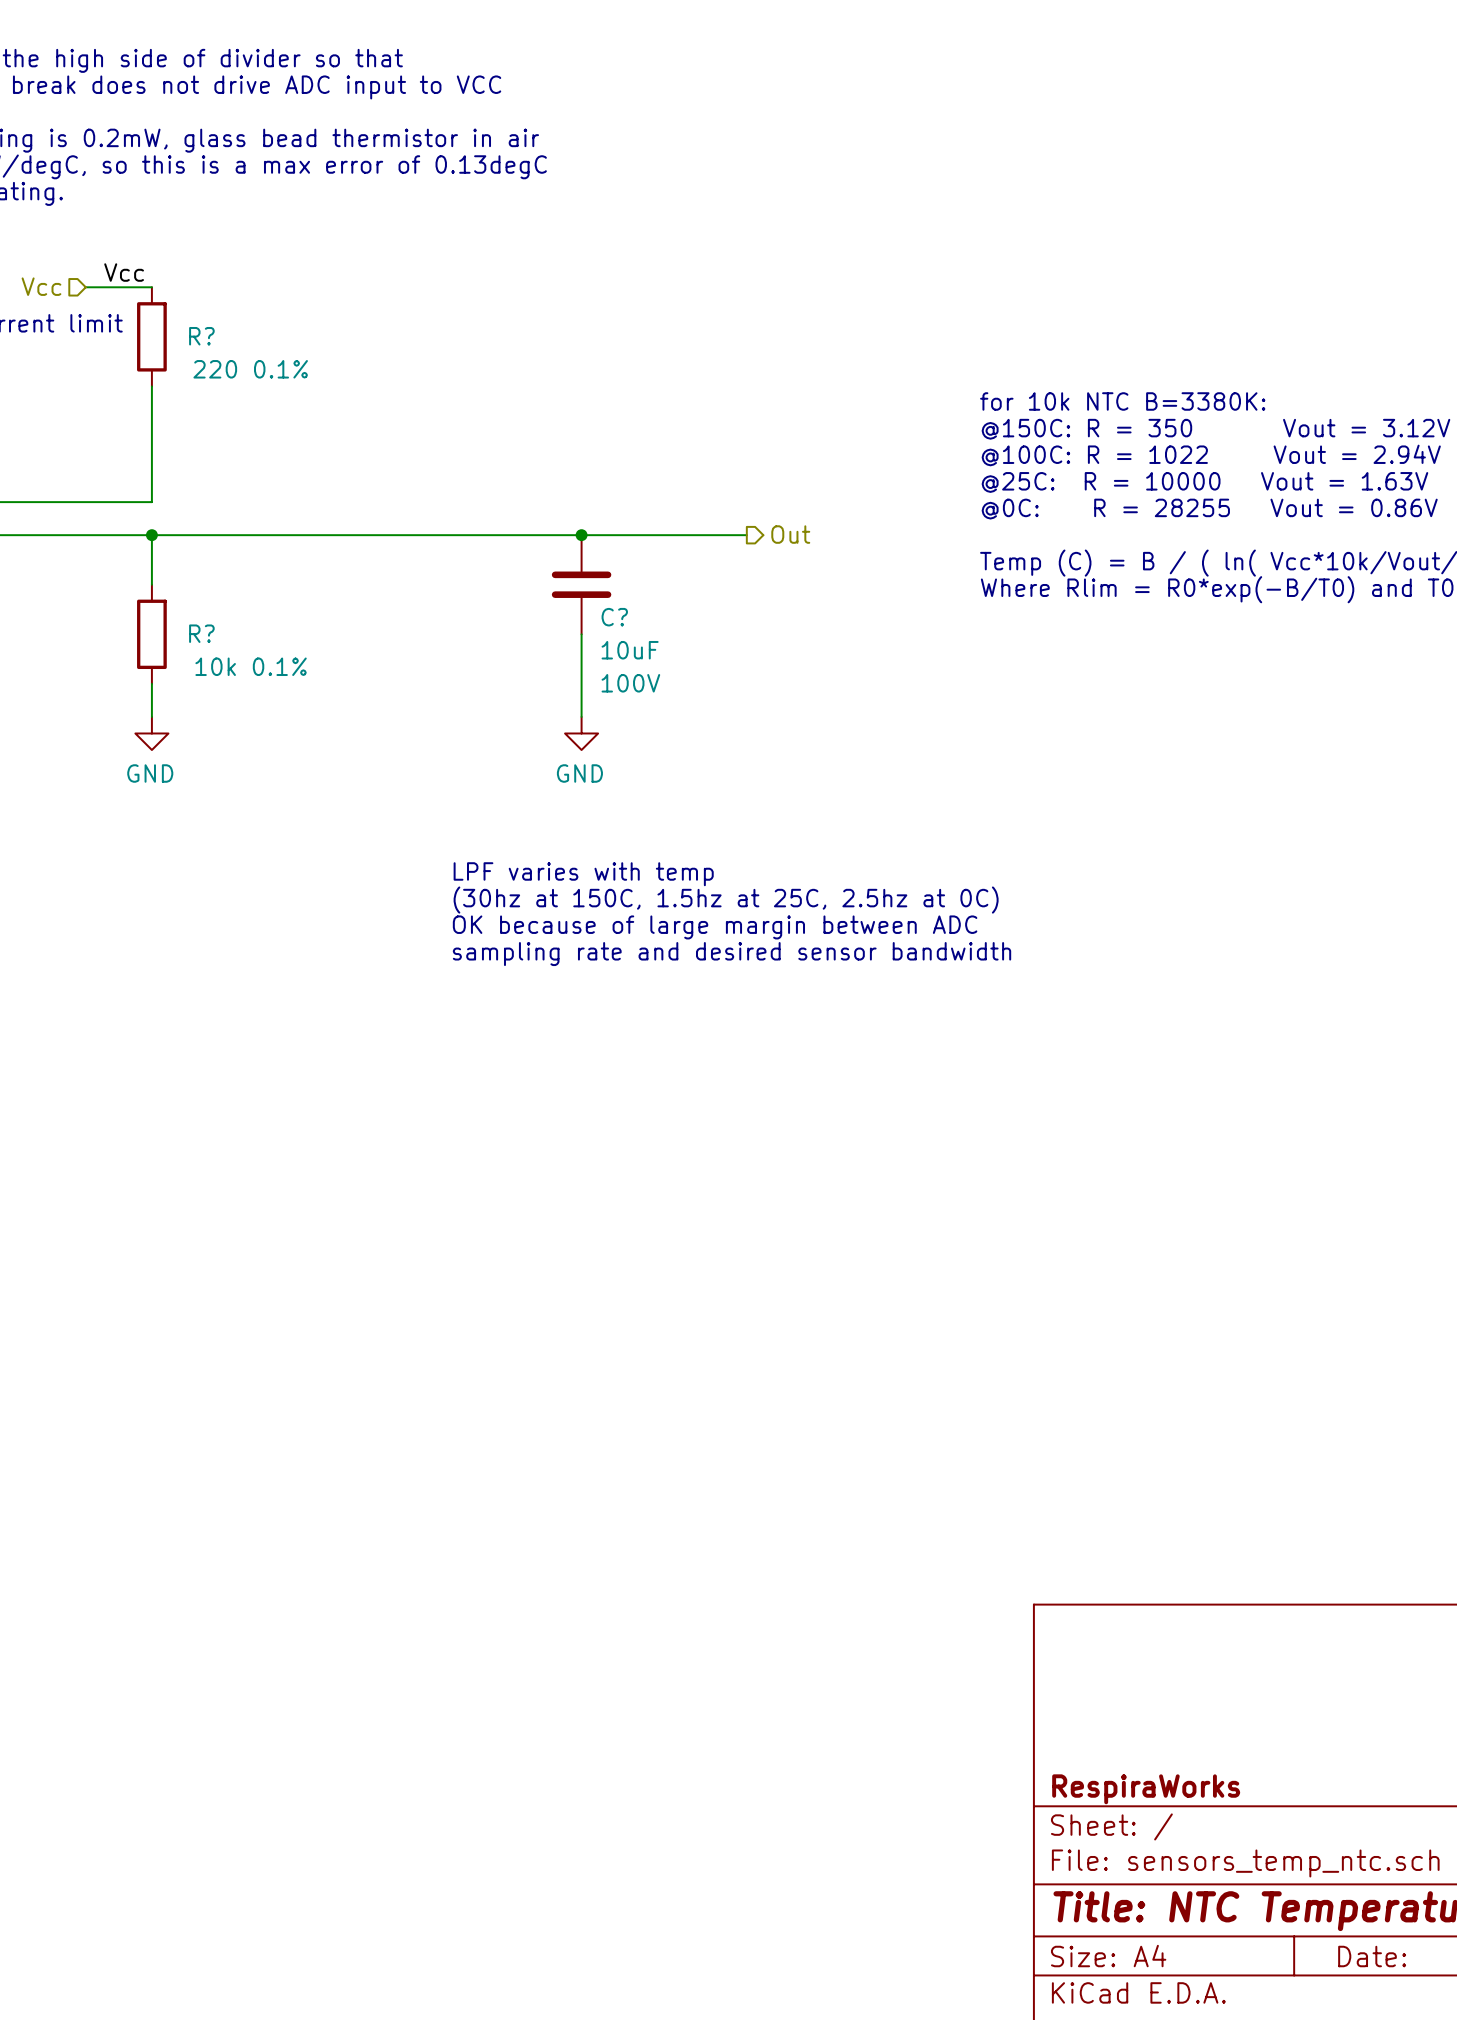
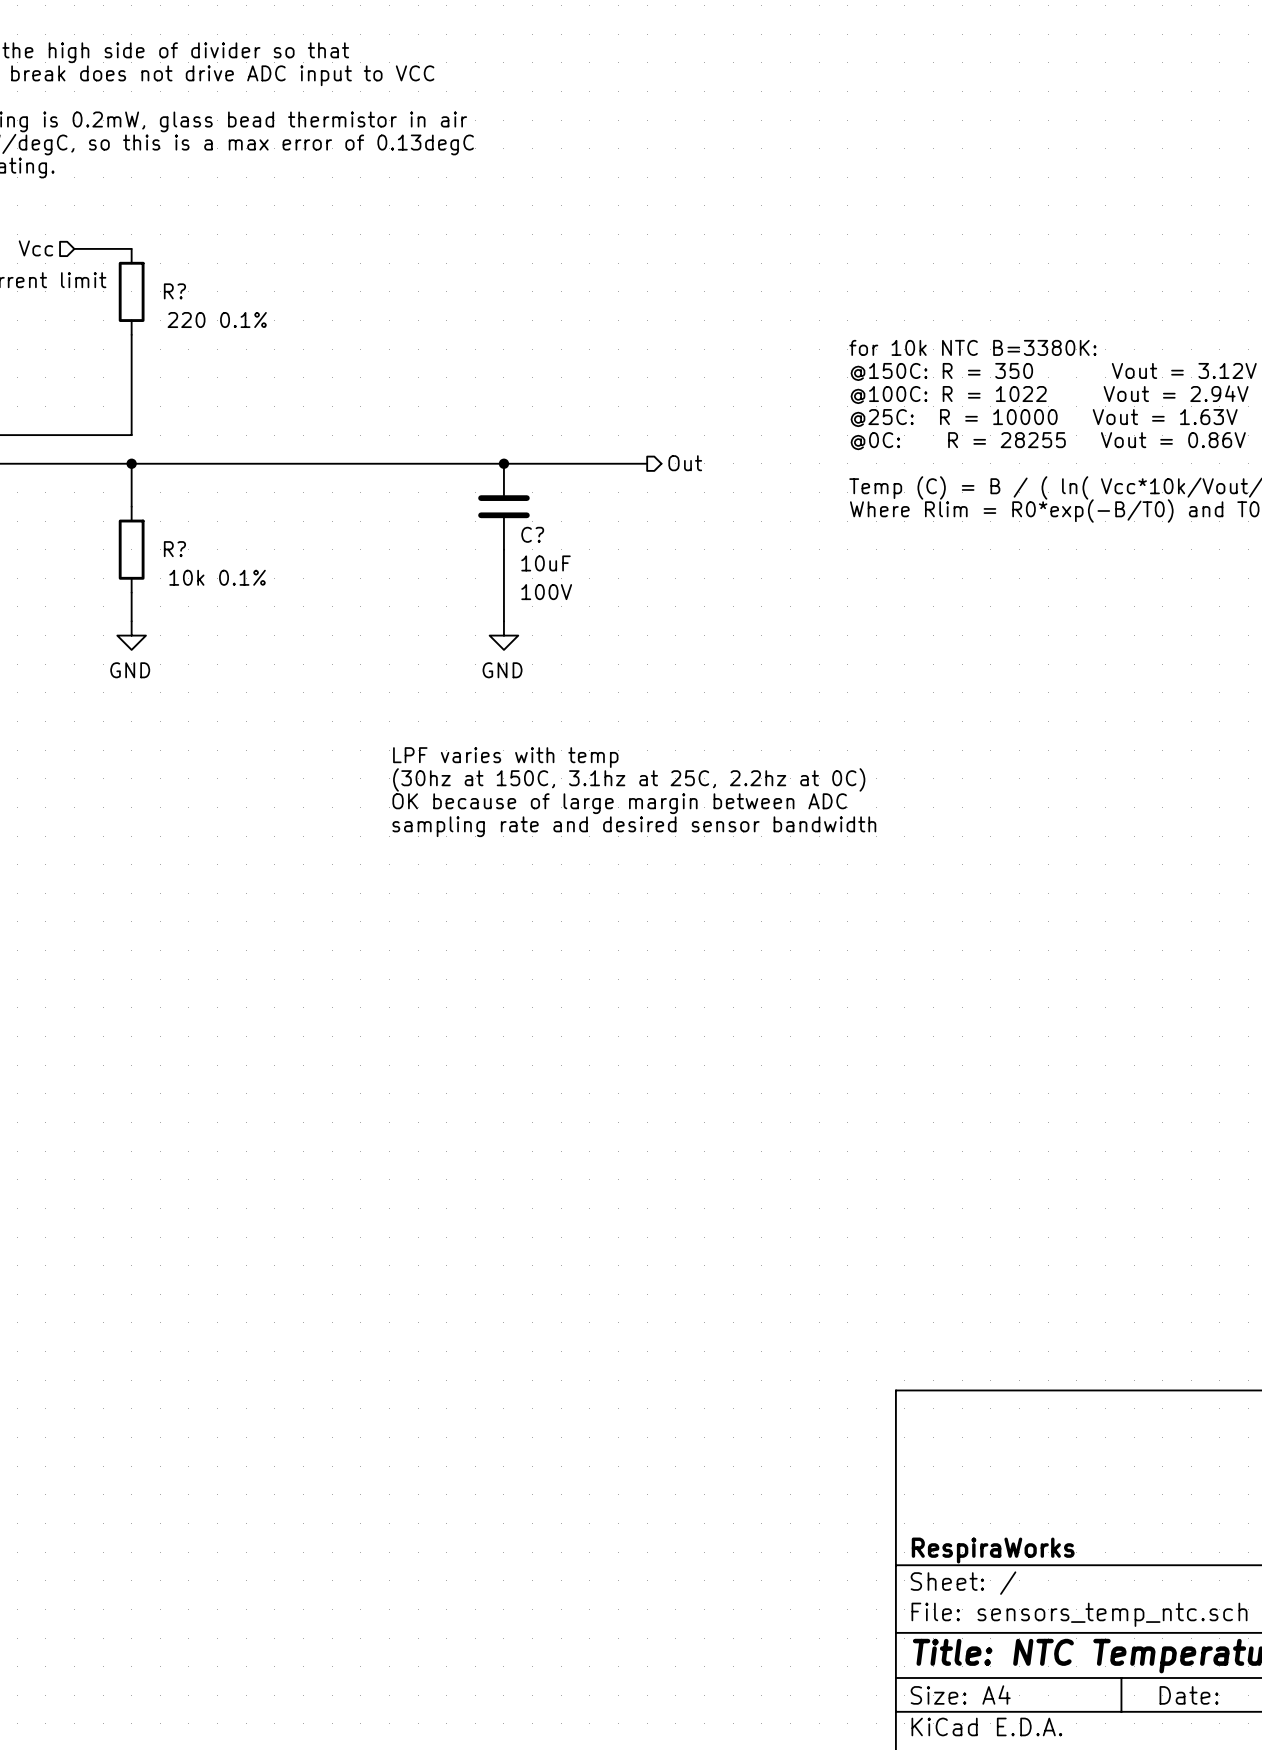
label: Vcc (124, 272) -> none
text: (30hz at 150C, 1.5hz at 25C, 2.5hz at 0C) (726, 900) -> (30hz at 150C, 3.1hz at 25C, 2.2hz at 0C) (629, 779)

